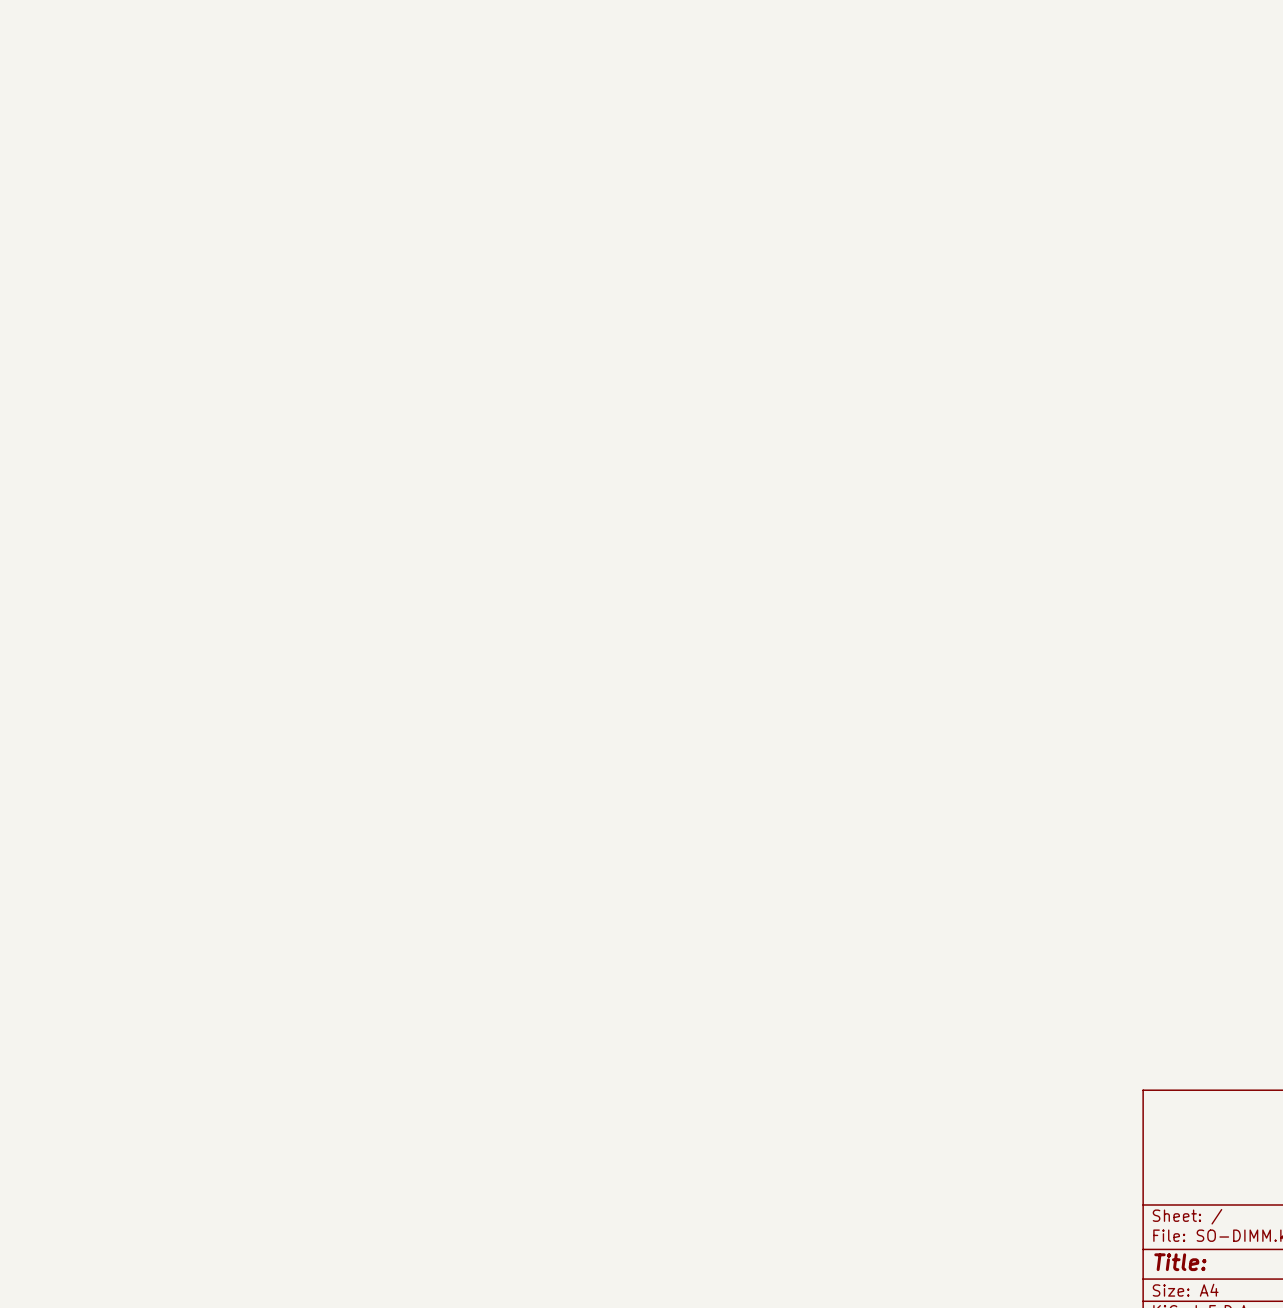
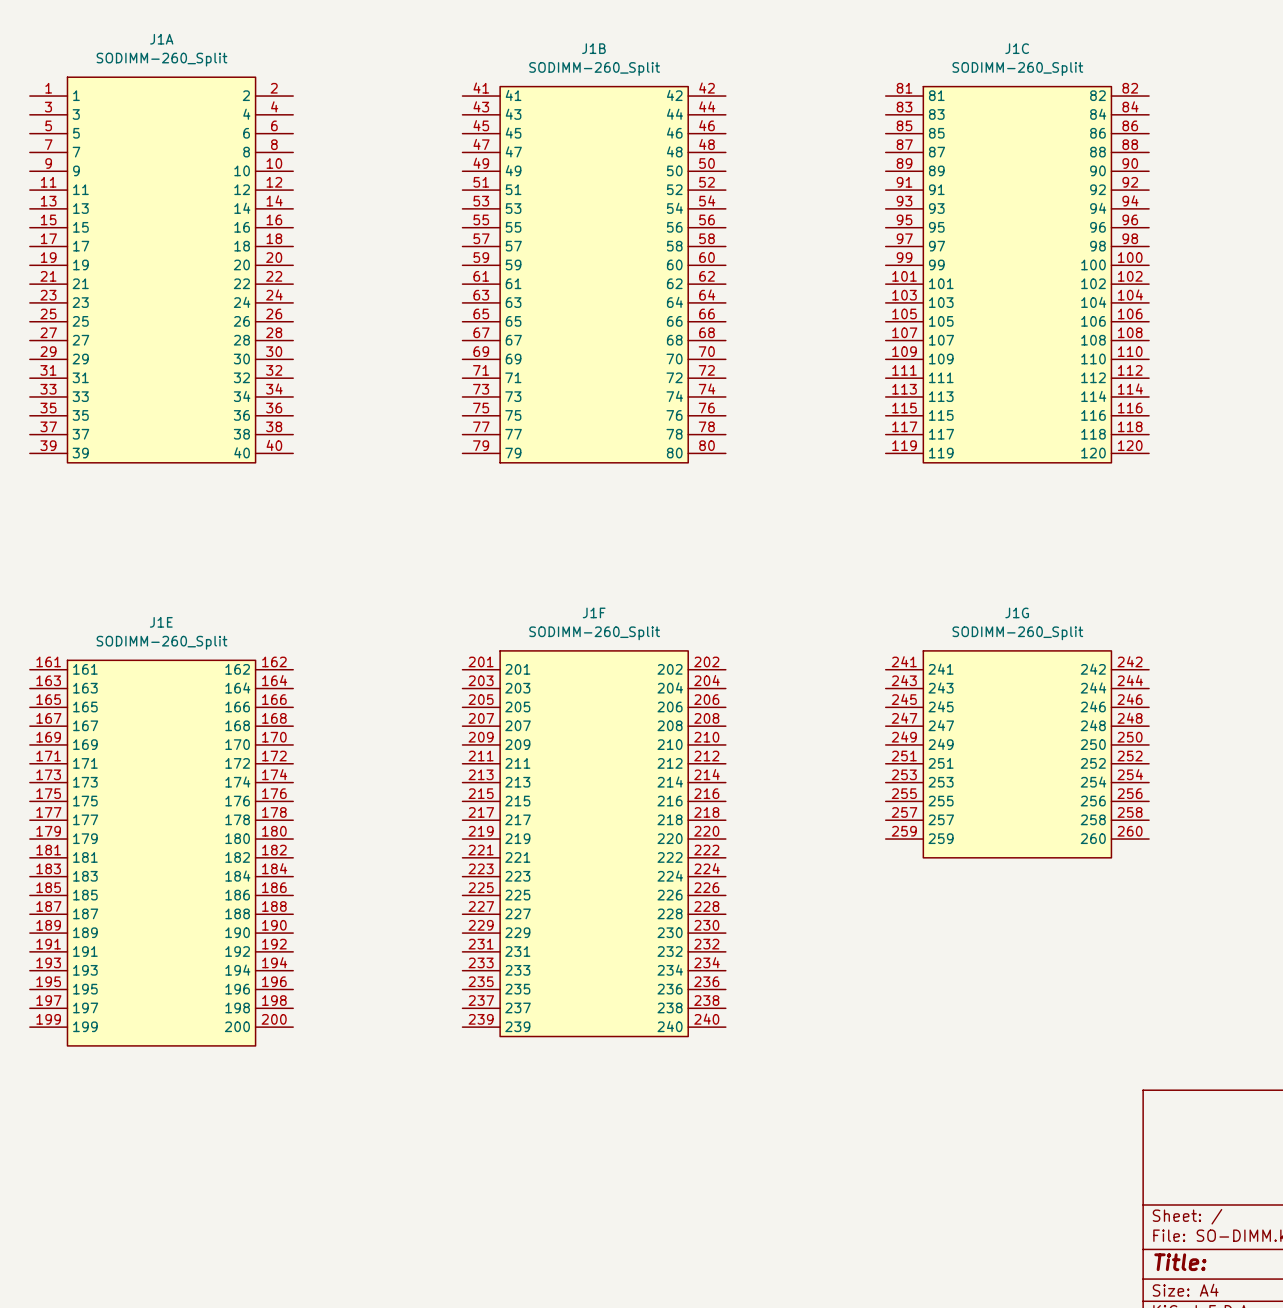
J1A: none -> SODIMM-260_Split (161, 270)
J1B: none -> SODIMM-260_Split (594, 274)
J1C: none -> SODIMM-260_Split (1017, 274)
J1G: none -> SODIMM-260_Split (1017, 754)
J1F: none -> SODIMM-260_Split (594, 843)
J1E: none -> SODIMM-260_Split (161, 853)

